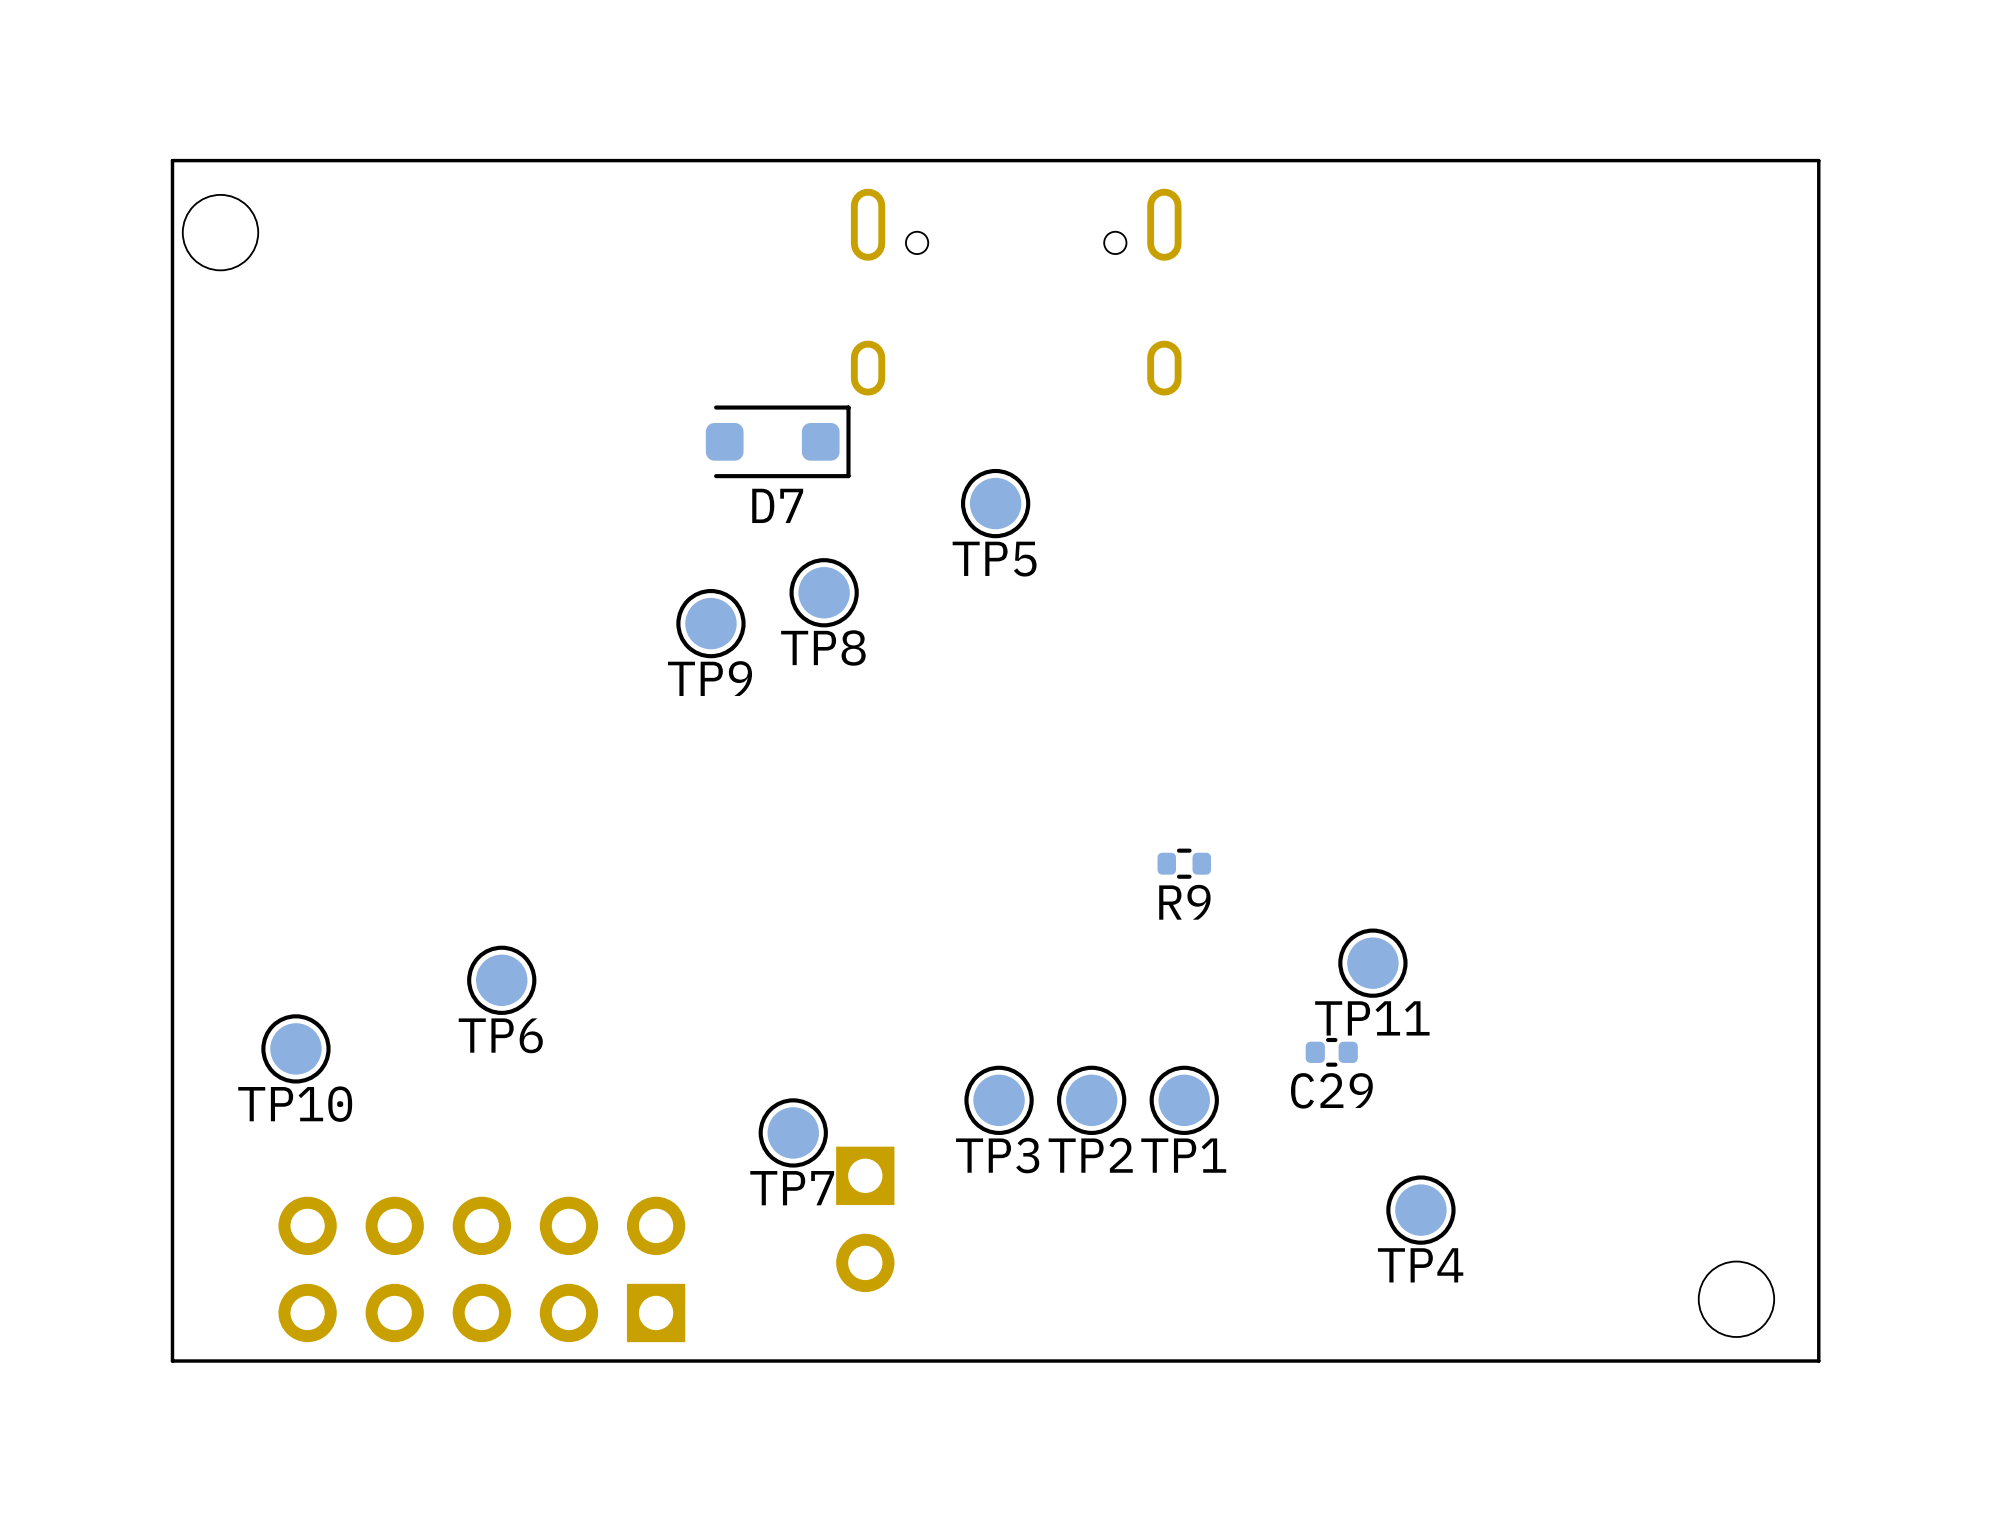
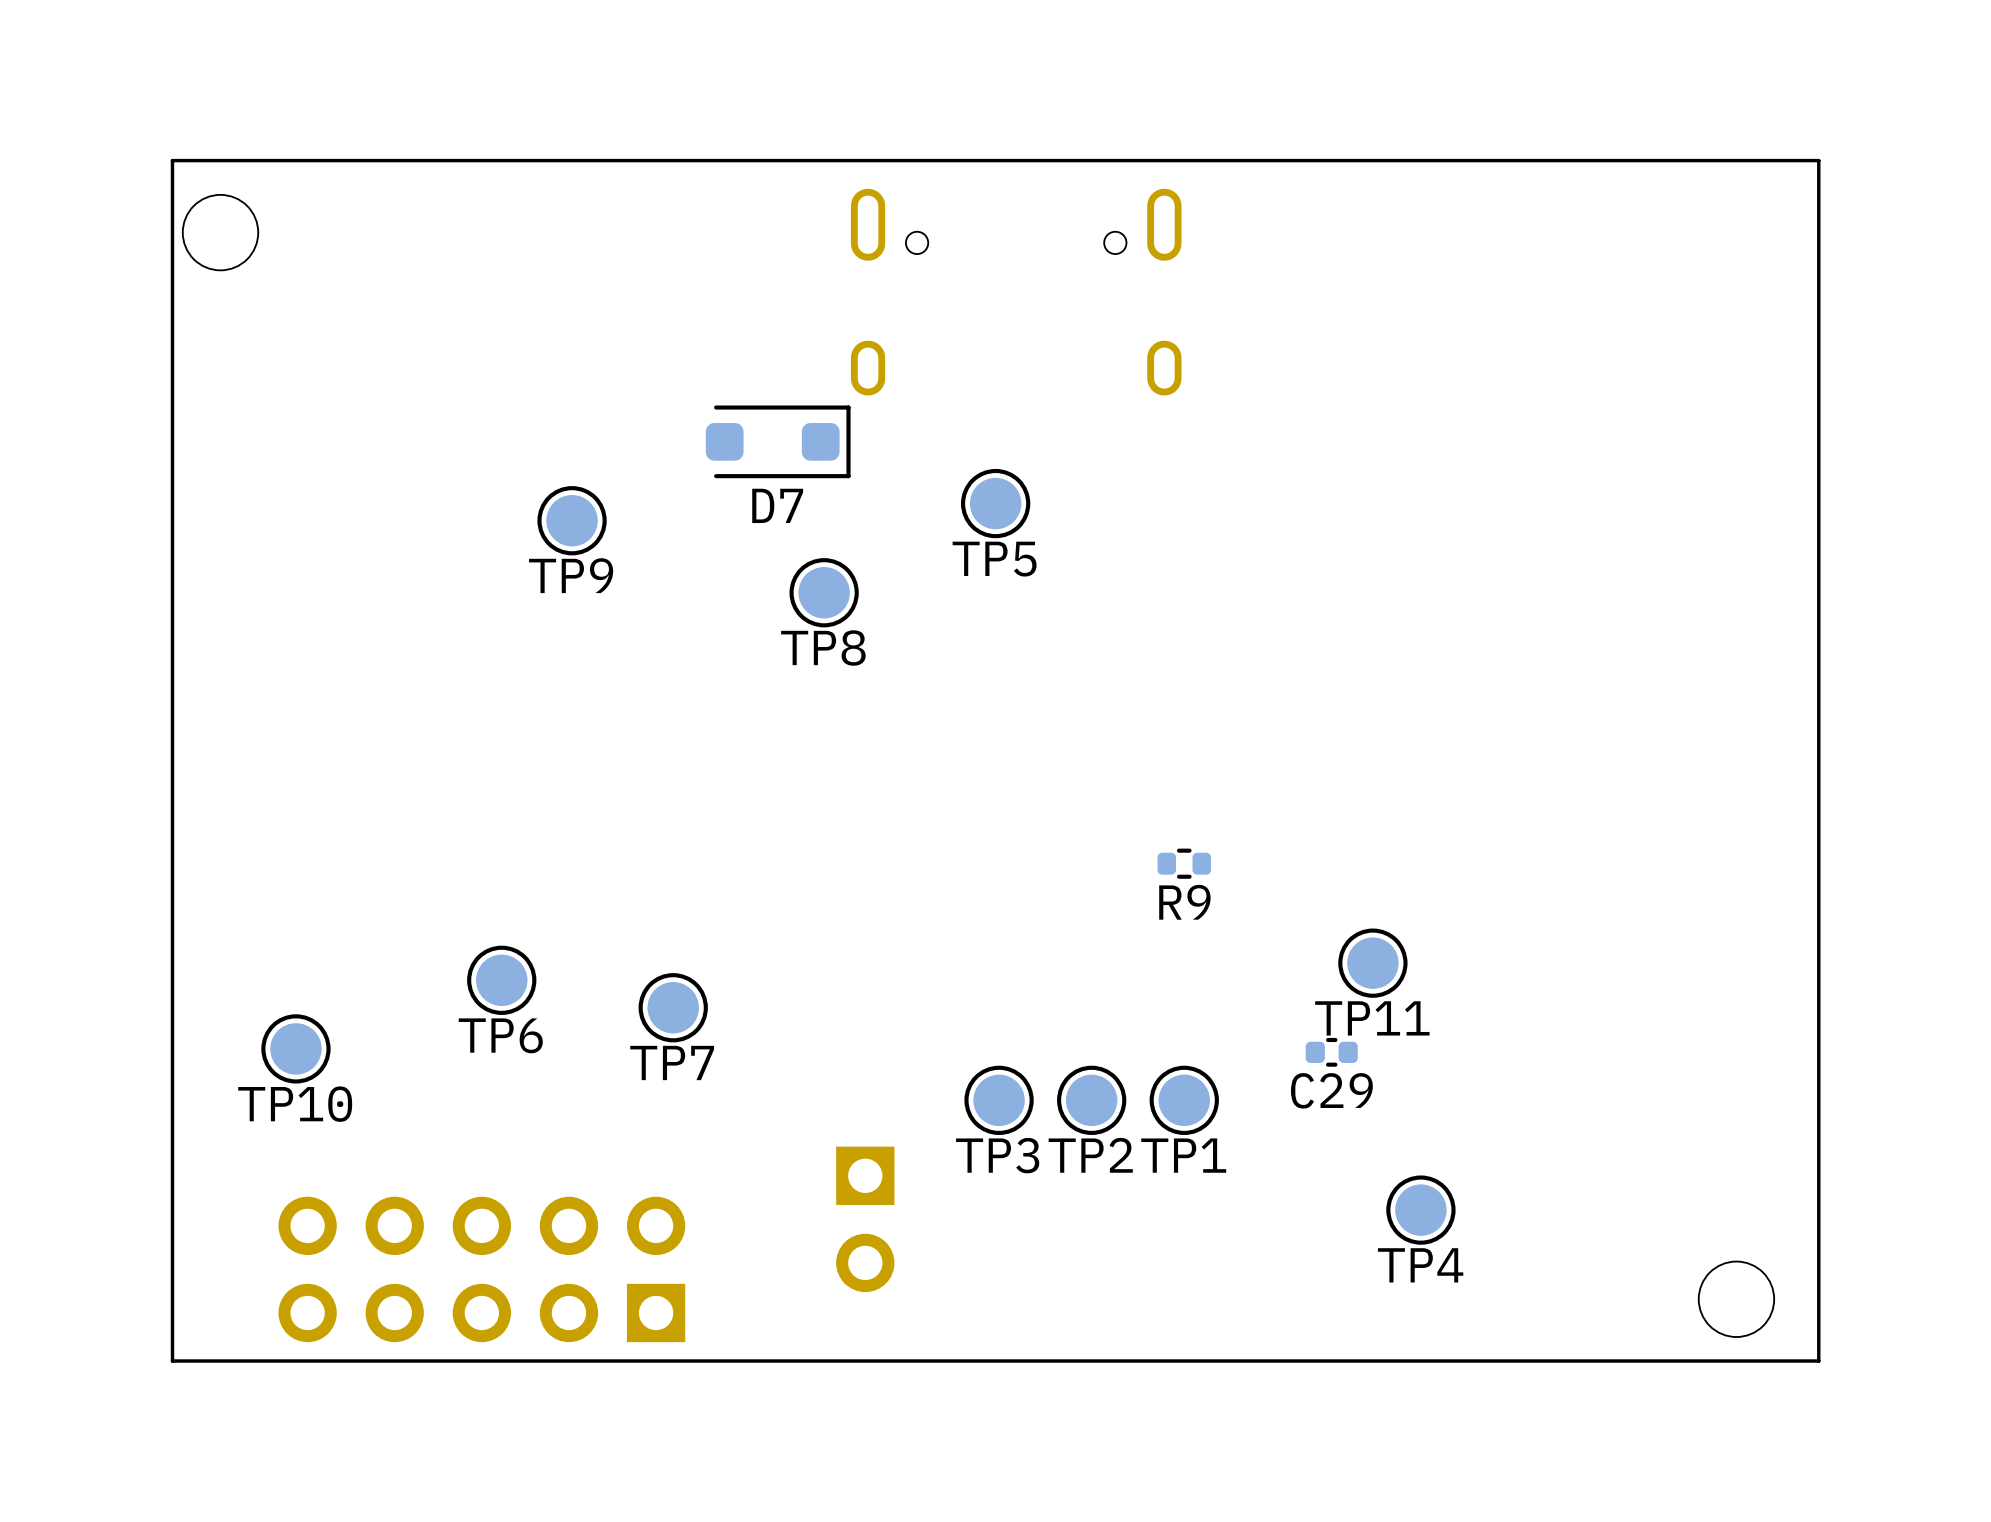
TP9 position: (710, 623) -> (572, 520)
TP7 position: (793, 1132) -> (673, 1007)

